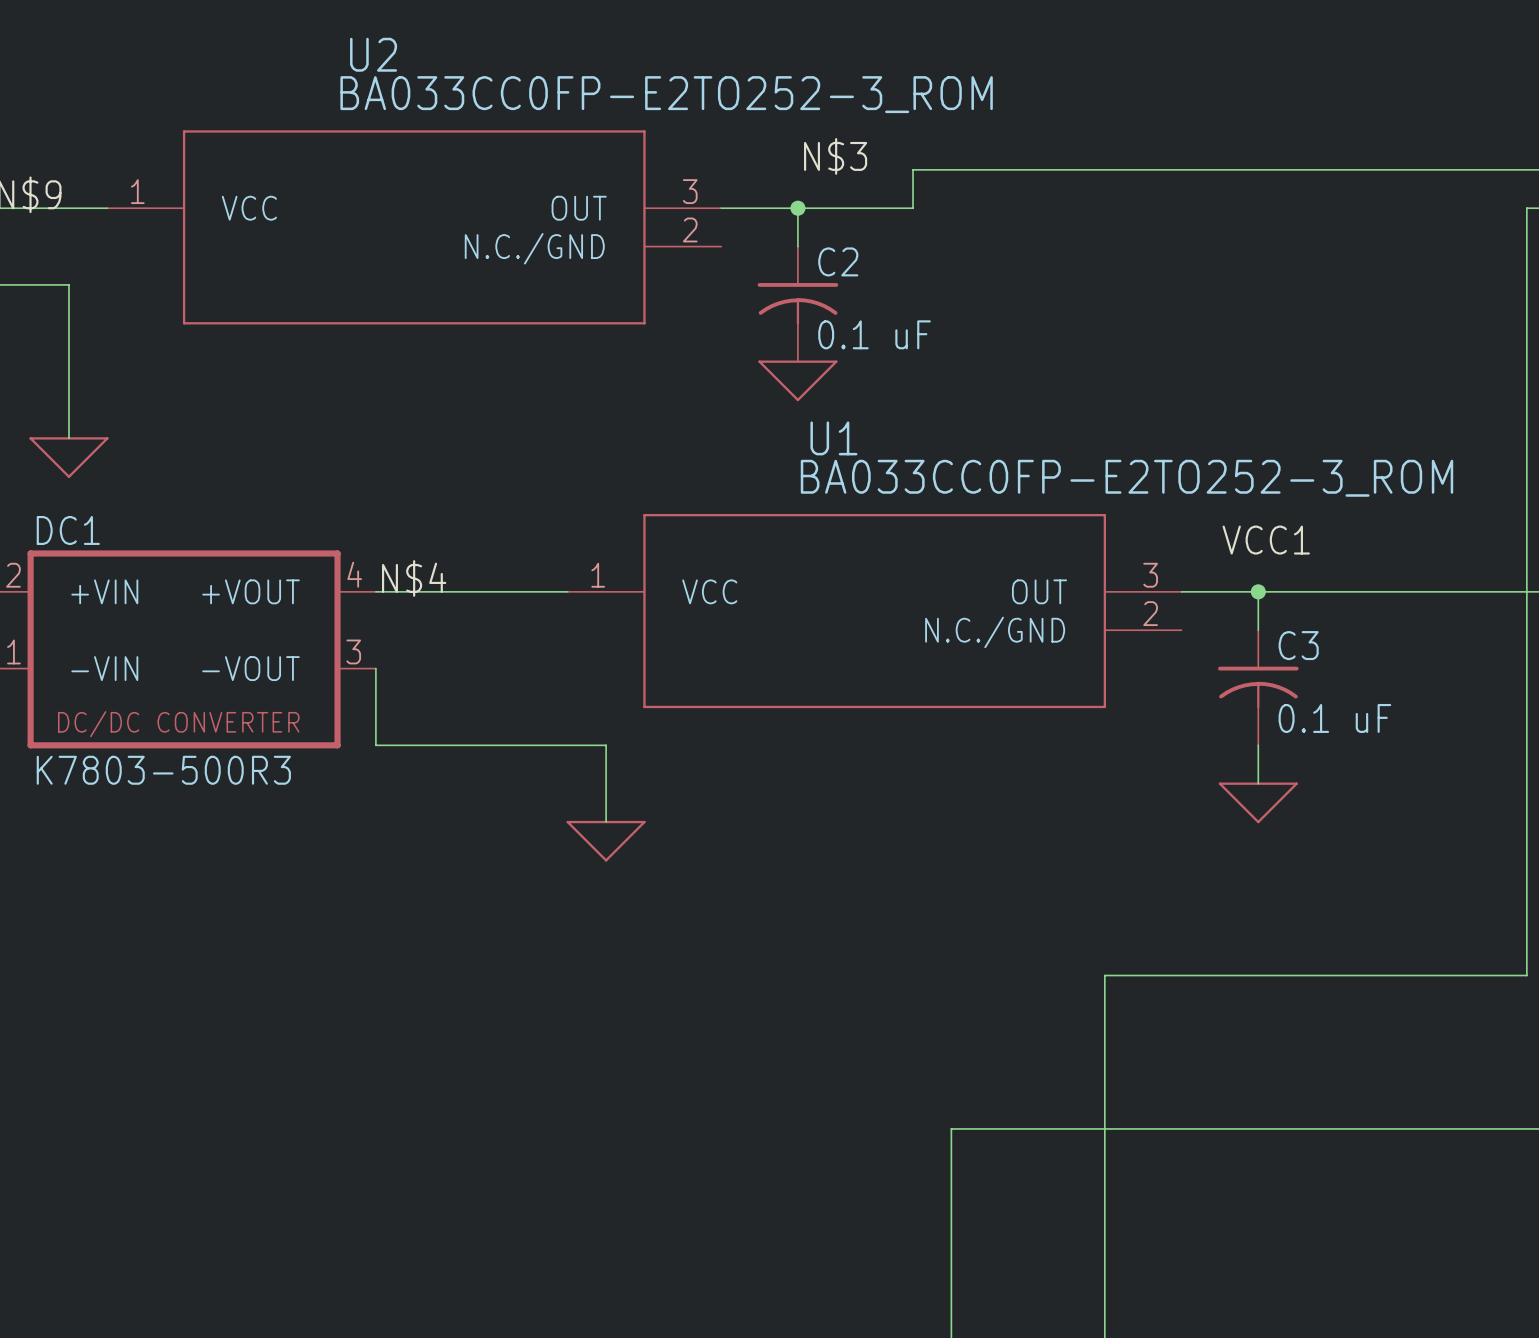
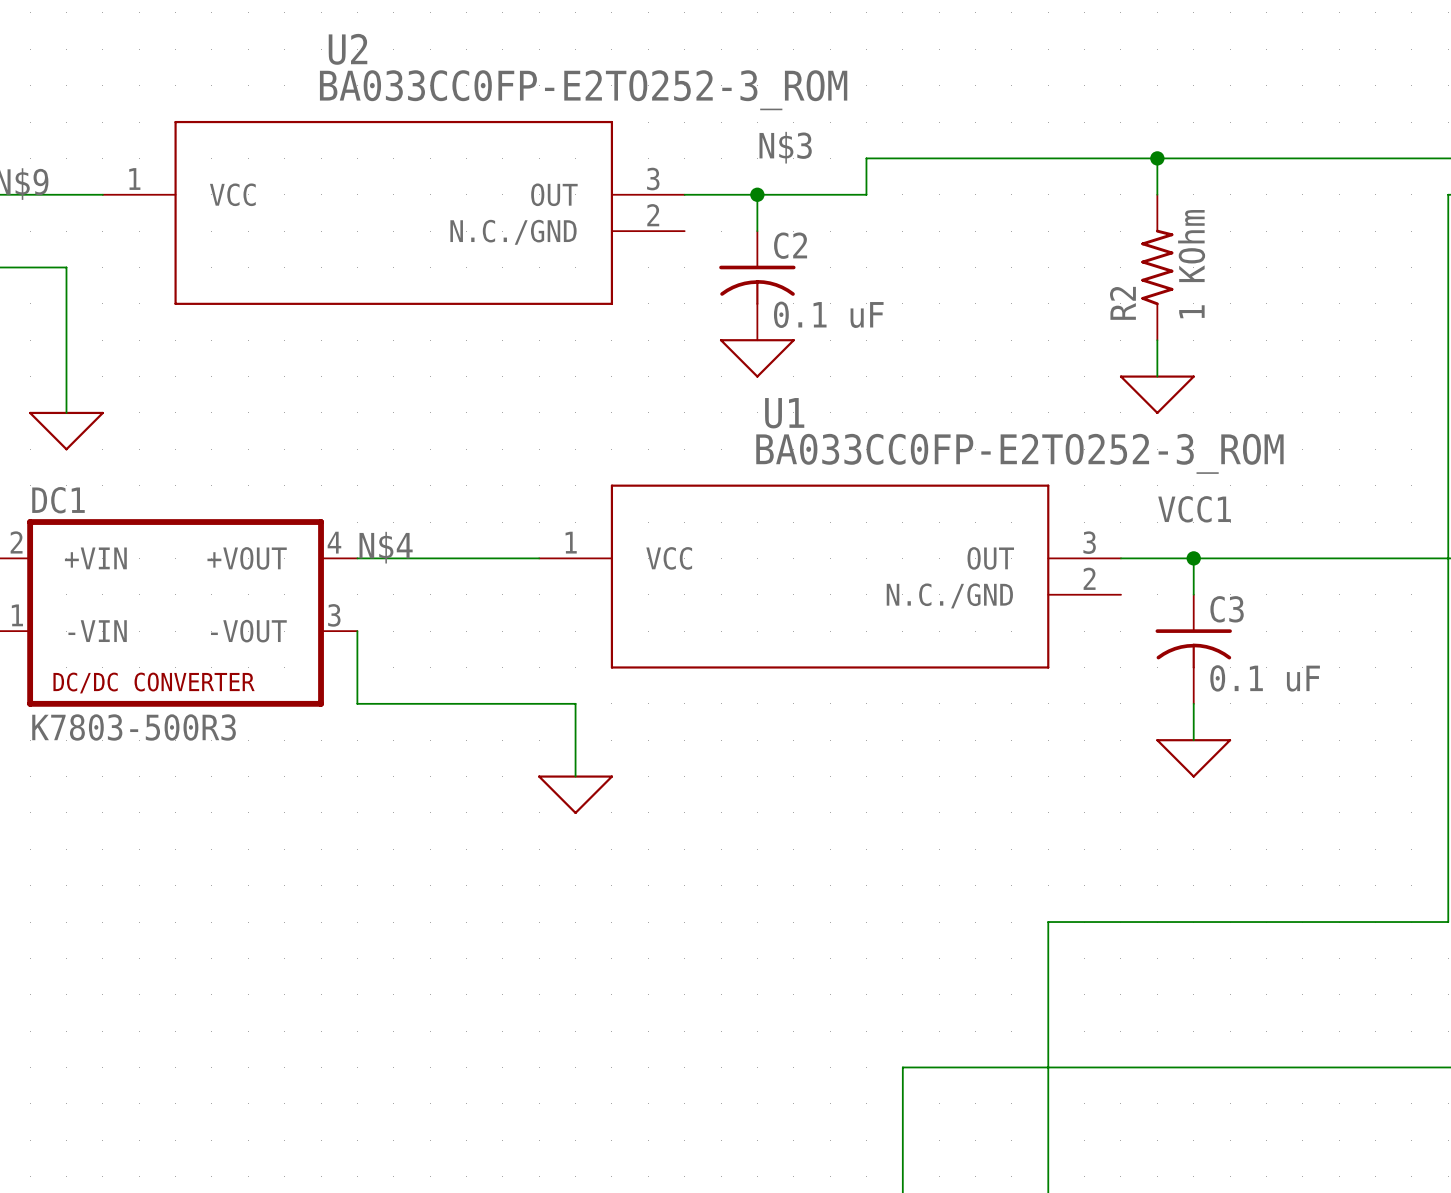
wire: none -> (1157, 158) (1157, 194)
junction: none -> (1157, 158)
R2: none -> 1 KOhm (1157, 267)
wire: none -> (1157, 340) (1157, 376)
power symbol: none -> (1157, 394)

